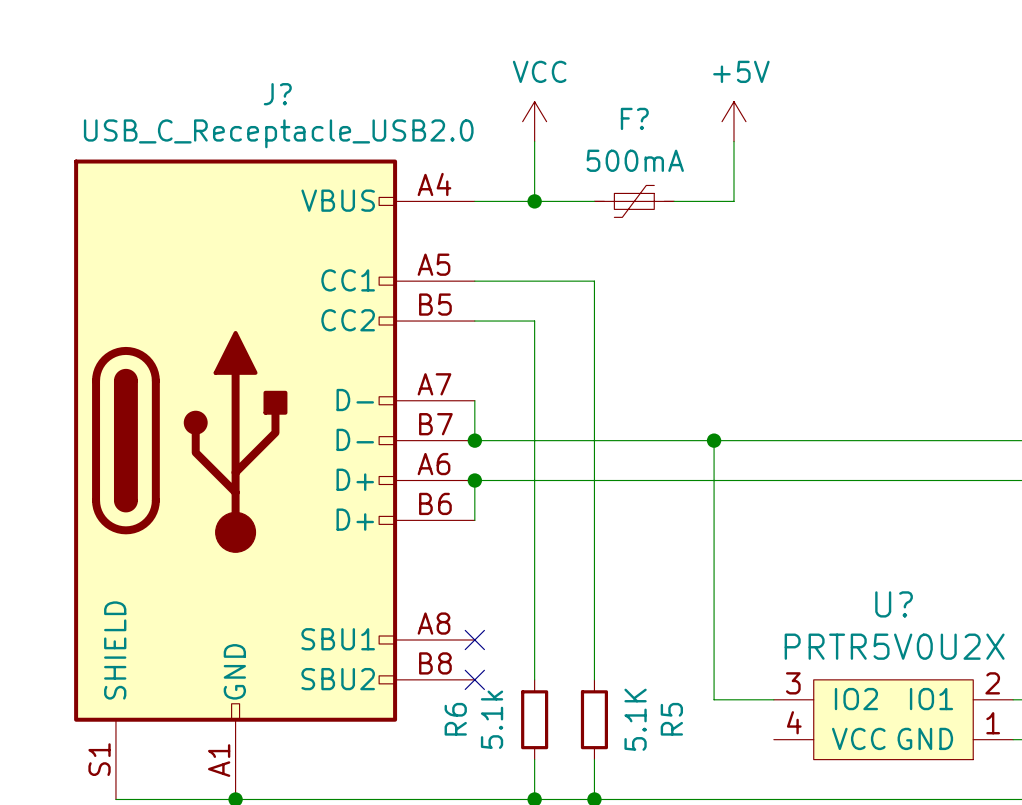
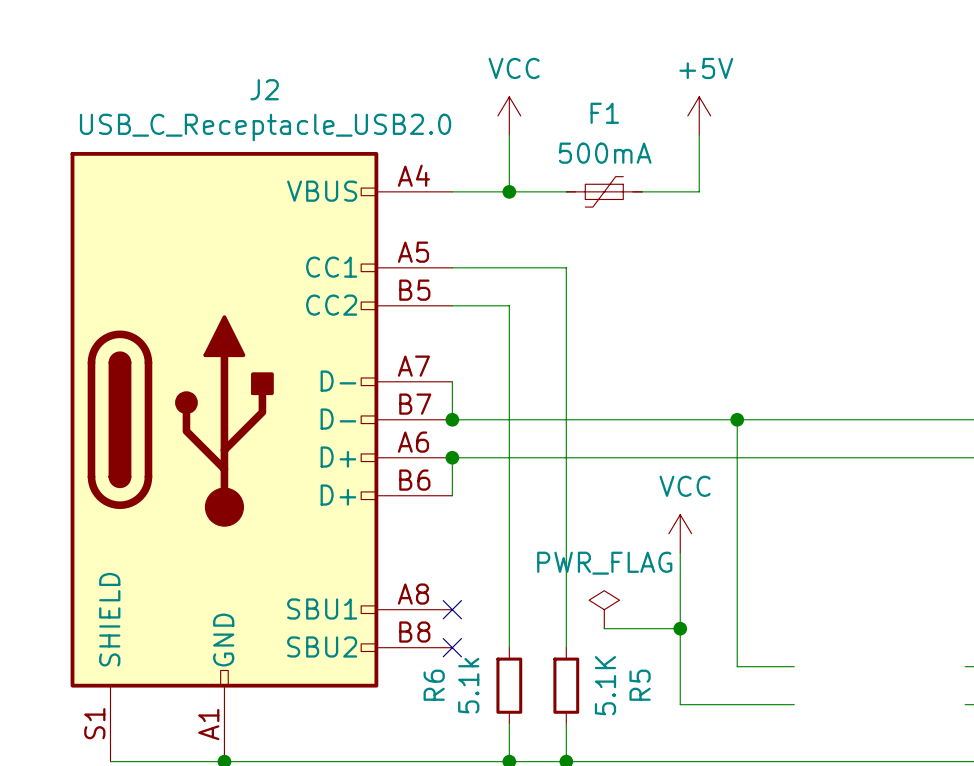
J? name: J? (277, 94) -> J2 (264, 89)
F? name: F? (634, 118) -> F1 (604, 113)
wire: (714, 440) (714, 580) -> none
junction position: (714, 440) -> (737, 419)
wire: none -> (737, 419) (737, 666) (794, 666)
power symbol: none -> VCC (680, 533)
power symbol: none -> PWR_FLAG (604, 609)
wire: none -> (604, 628) (680, 628)
junction: none -> (680, 628)
wire: (714, 699) (773, 699) -> (680, 666) (680, 704) (794, 704)
U?: PRTR5V0U2X (893, 719) -> none

